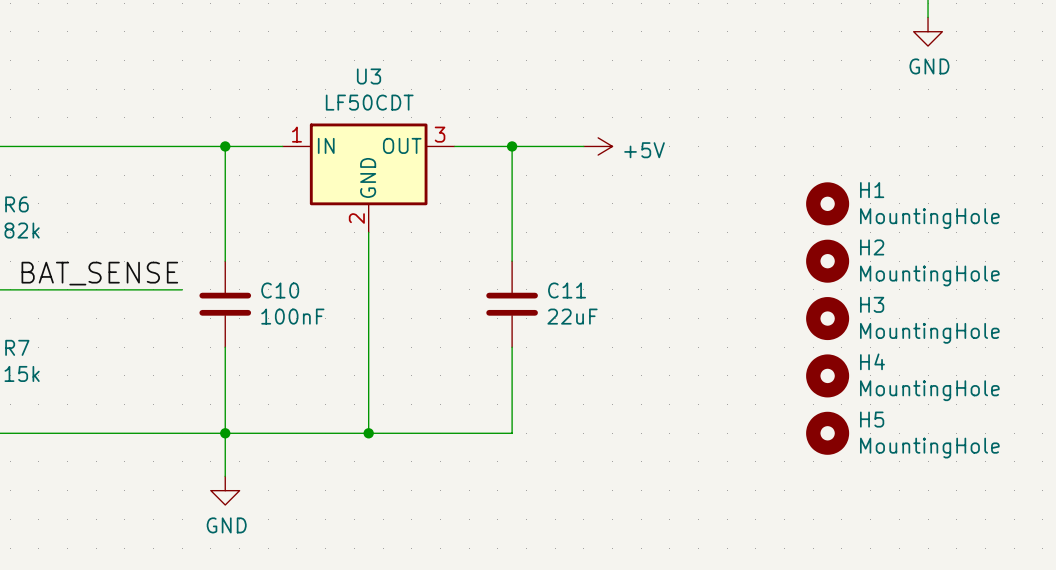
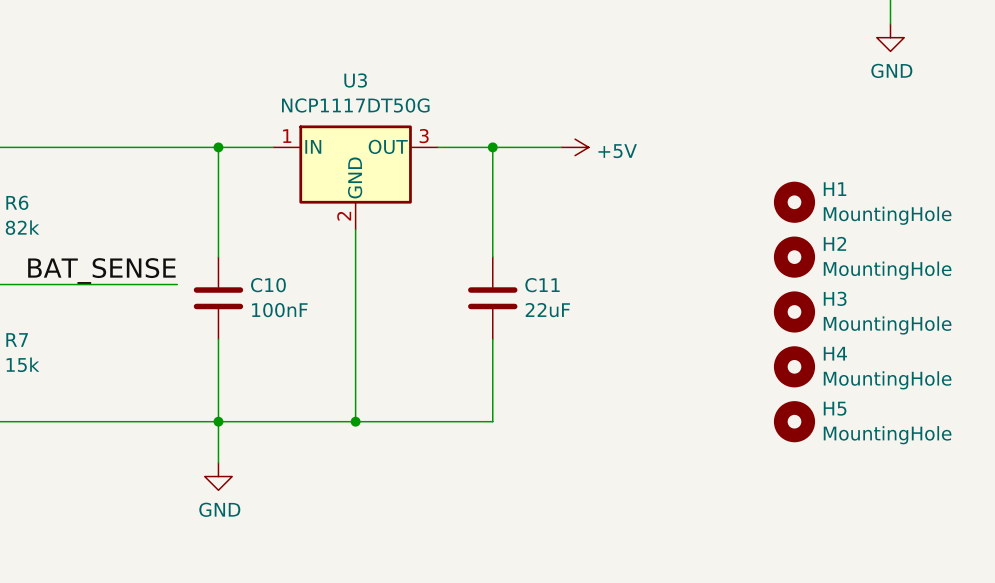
U3 value: LF50CDT (369, 102) -> NCP1117DT50G (355, 105)

